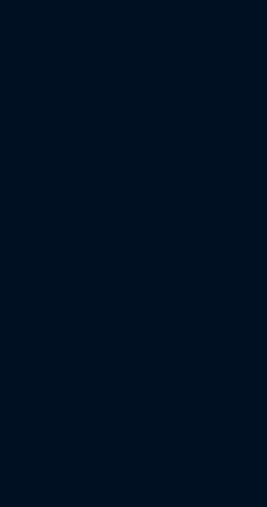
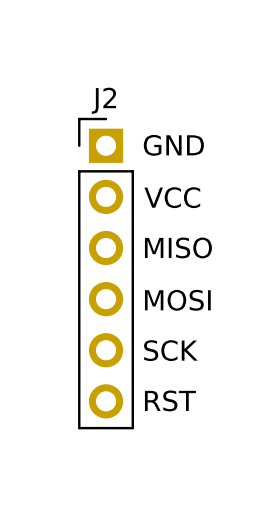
J2: none -> (106, 273)

